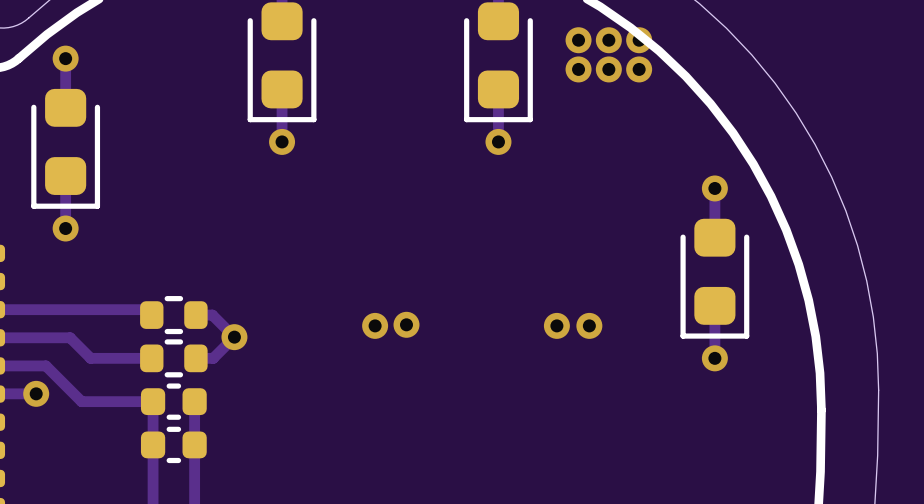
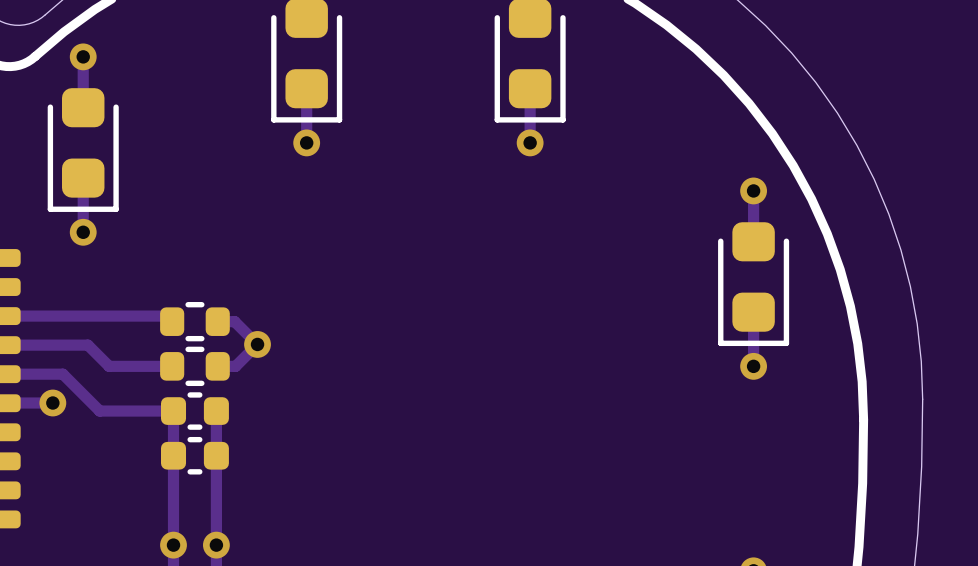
via: (578, 40) -> none
via: (608, 40) -> none
via: (639, 40) -> none
via: (578, 69) -> none
via: (608, 69) -> none
via: (639, 69) -> none
via: (406, 324) -> none
via: (375, 325) -> none
via: (556, 325) -> none
via: (589, 325) -> none

